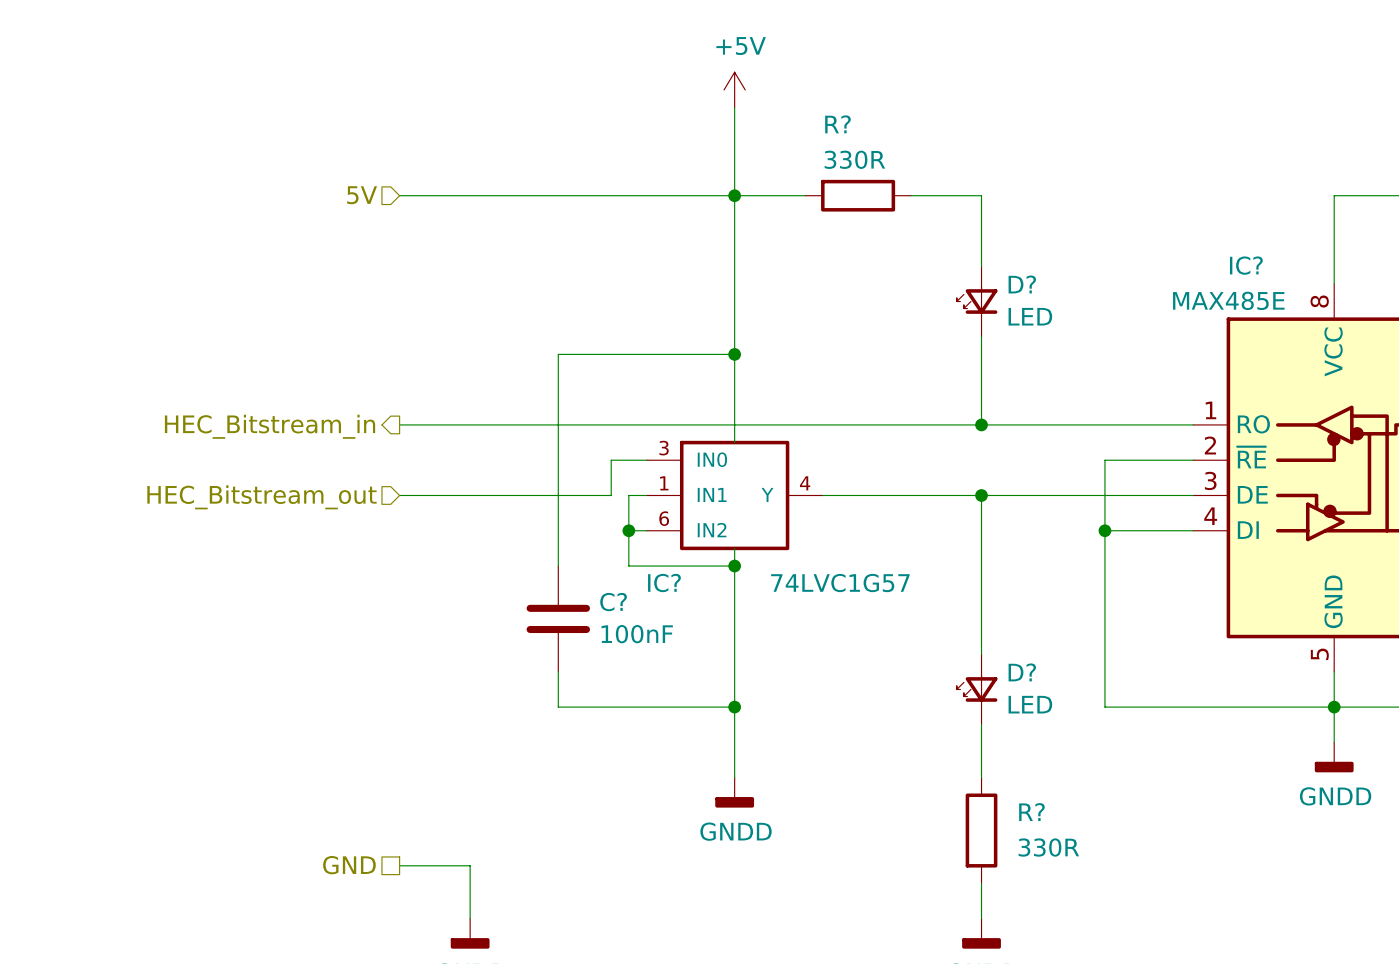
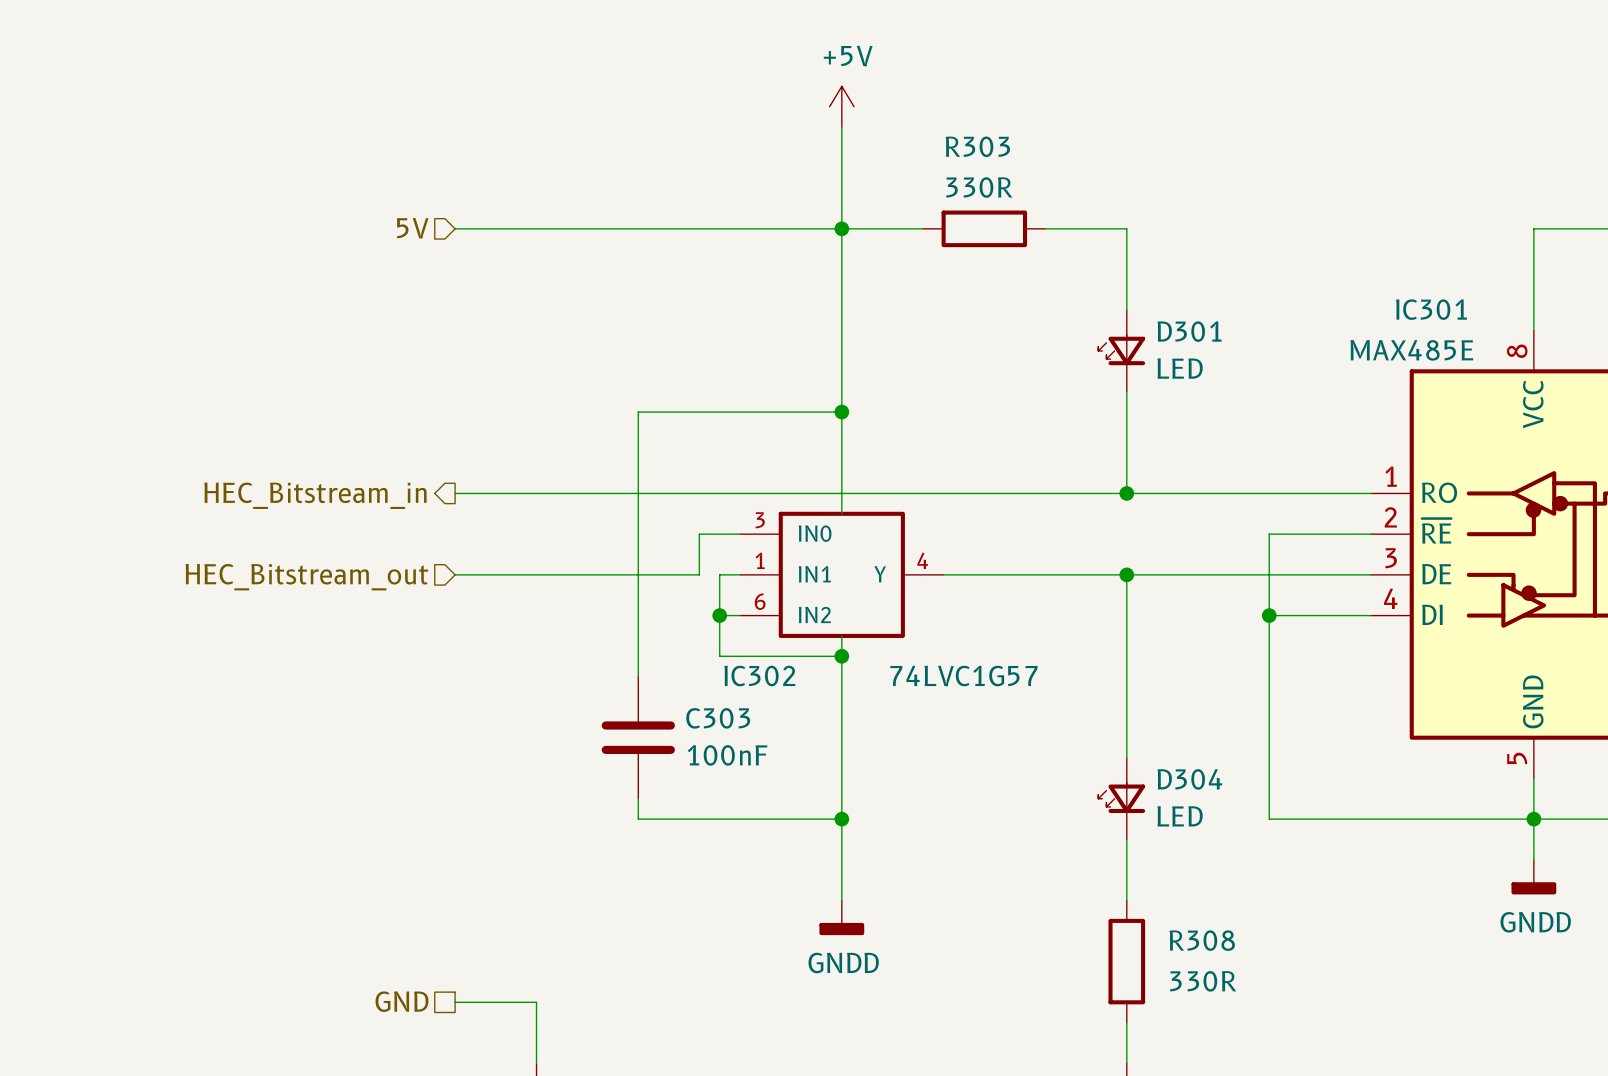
R? name: R? (837, 124) -> R303 (977, 146)
IC? name: IC? (1246, 265) -> IC301 (1431, 309)
D? name: D? (1022, 284) -> D301 (1189, 331)
IC? name: IC? (664, 583) -> IC302 (759, 675)
C?: 100nF (558, 618) -> none
C303: none -> 100nF (638, 737)
D? name: D? (1022, 672) -> D304 (1189, 779)
R? name: R? (1031, 812) -> R308 (1202, 940)

